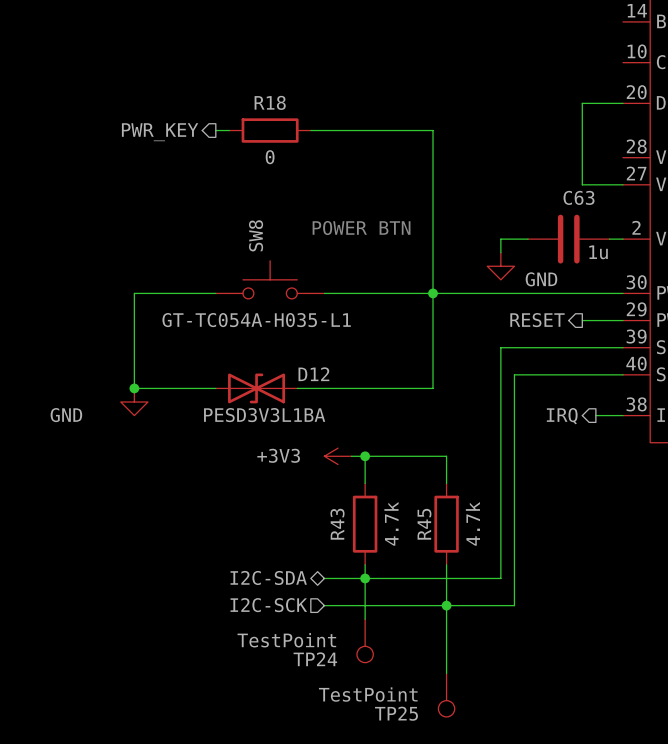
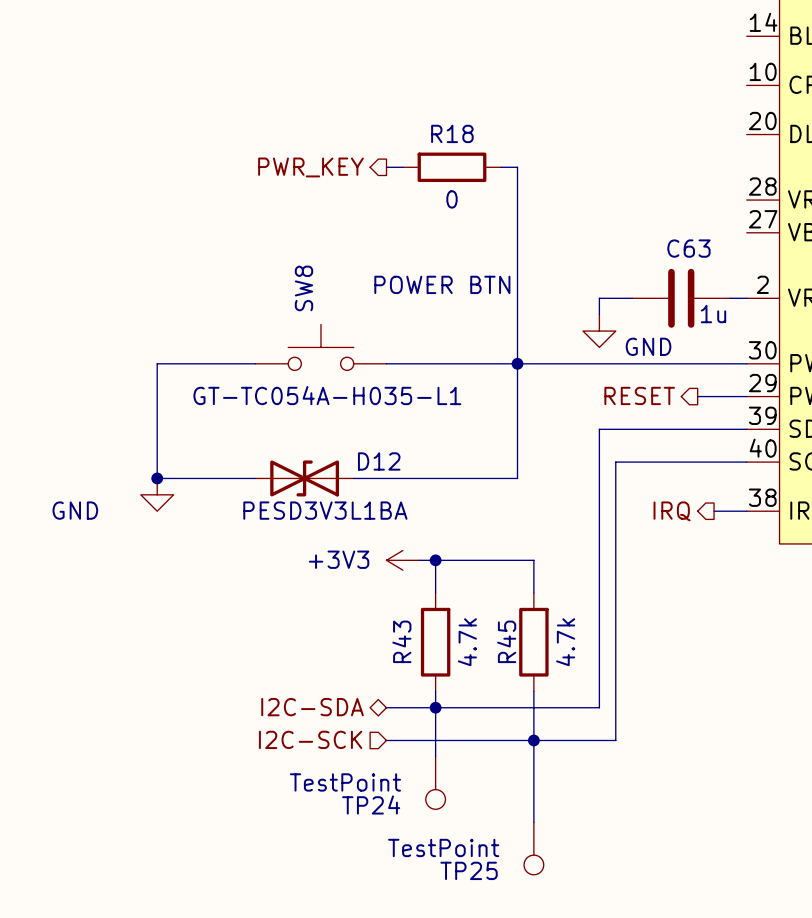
wire: (623, 103) (582, 103) (582, 184) (623, 184) -> none
wire: (215, 130) (229, 130) -> none
R18 position: (270, 130) -> (452, 167)
wire: (310, 130) (324, 130) -> none
wire: (337, 130) (419, 130) -> none
hierarchical label position: PWR_KEY (160, 132) -> PWR_KEY (310, 167)

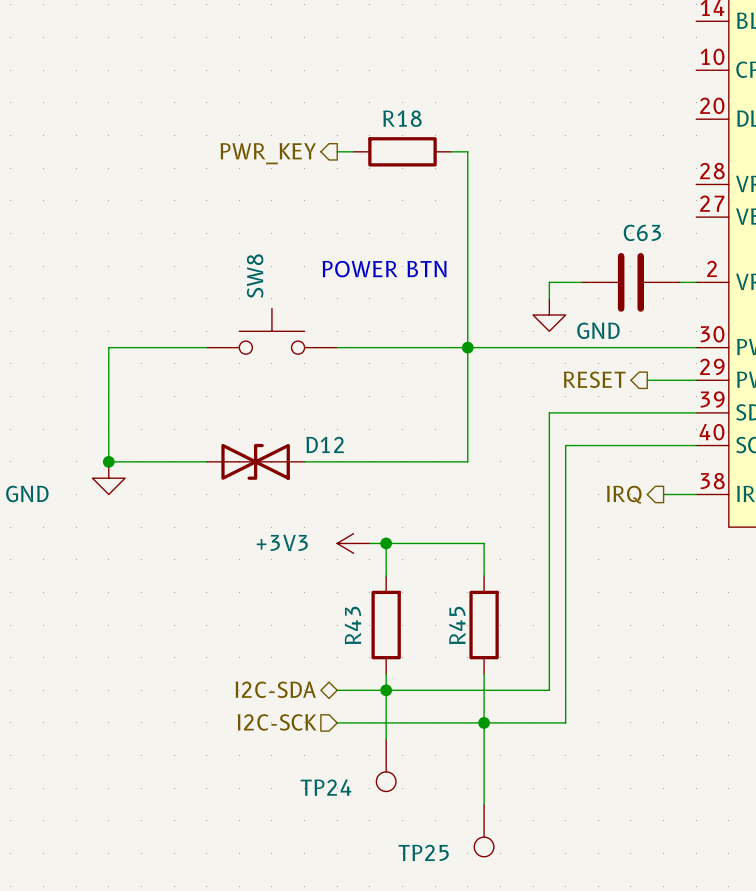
R18 value: 0 (452, 199) -> none
C63 value: 1u (713, 314) -> none
SW8 value: GT-TC054A-H035-L1 (327, 395) -> none
D12 value: PESD3V3L1BA (325, 510) -> none
R43 value: 4.7k (467, 642) -> none
R45 value: 4.7k (565, 642) -> none
TP24 value: TestPoint (345, 782) -> none
TP25 value: TestPoint (443, 847) -> none

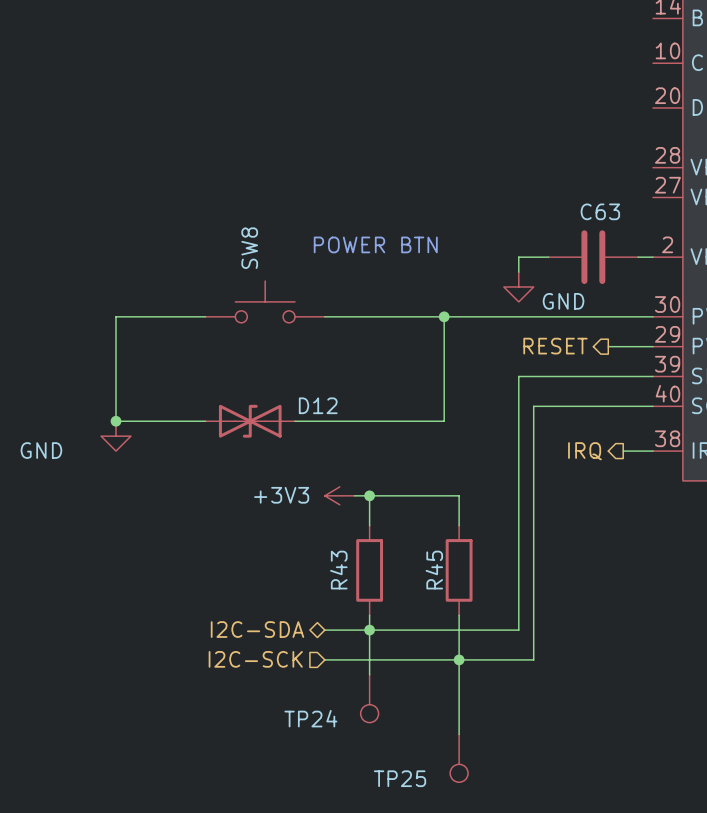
wire: (337, 151) (353, 151) -> none
R18: (402, 151) -> none
wire: (451, 151) (467, 151) (467, 347) -> none
hierarchical label: PWR_KEY (268, 153) -> none

